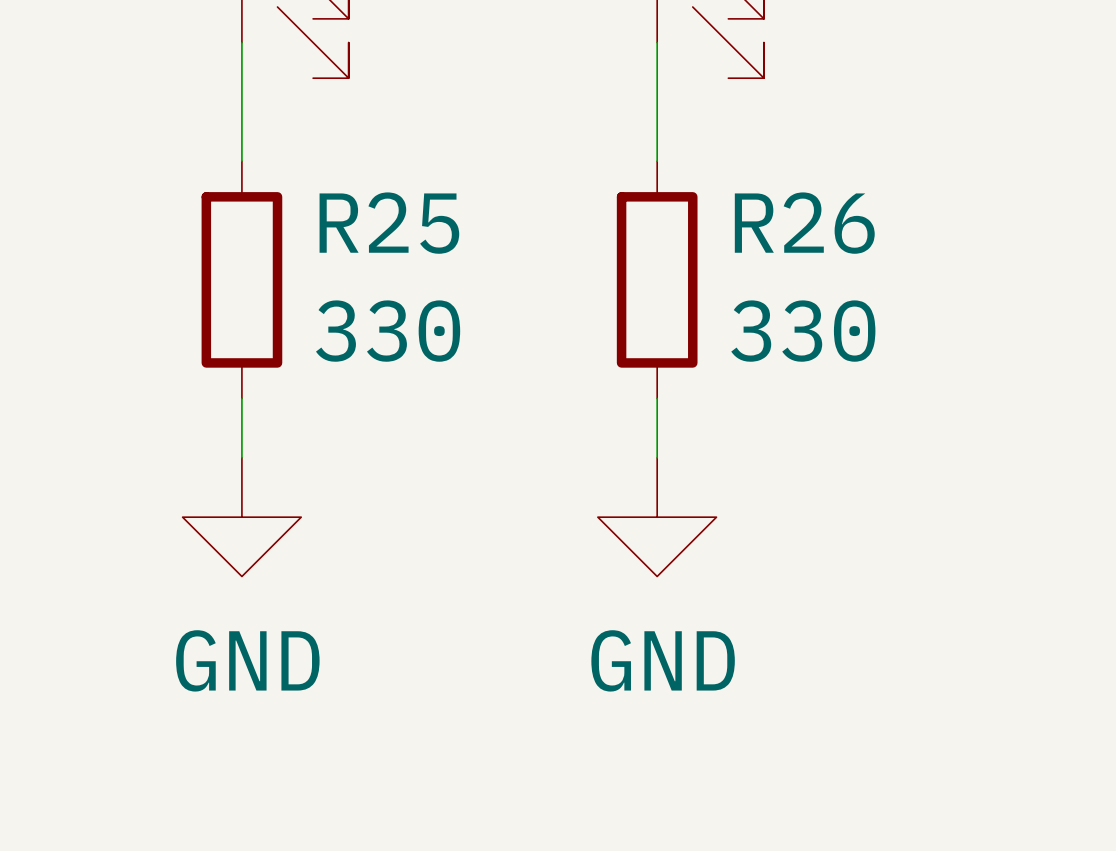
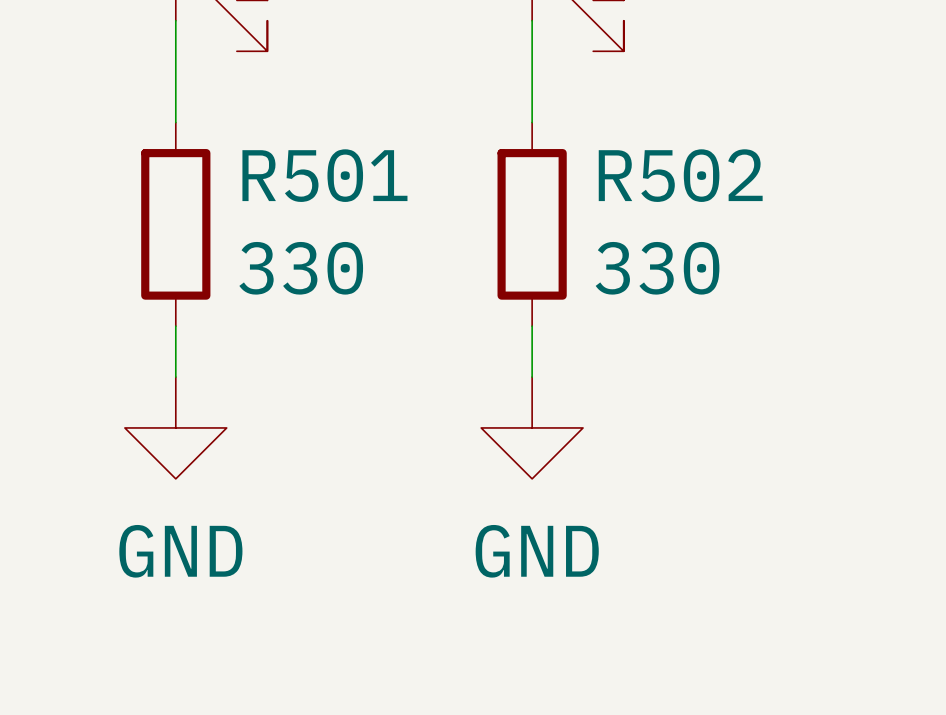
R25 name: R25 (389, 223) -> R501 (324, 175)
R26 name: R26 (804, 223) -> R502 (680, 175)

